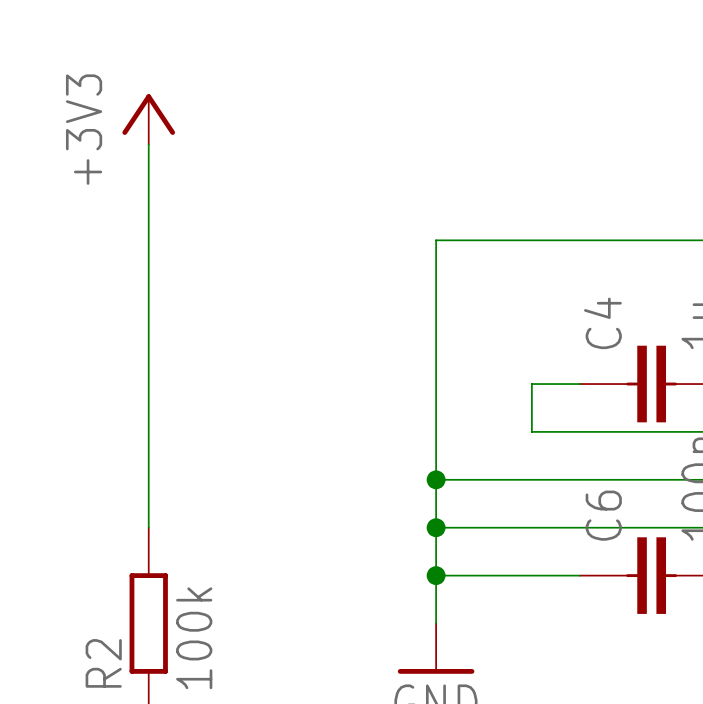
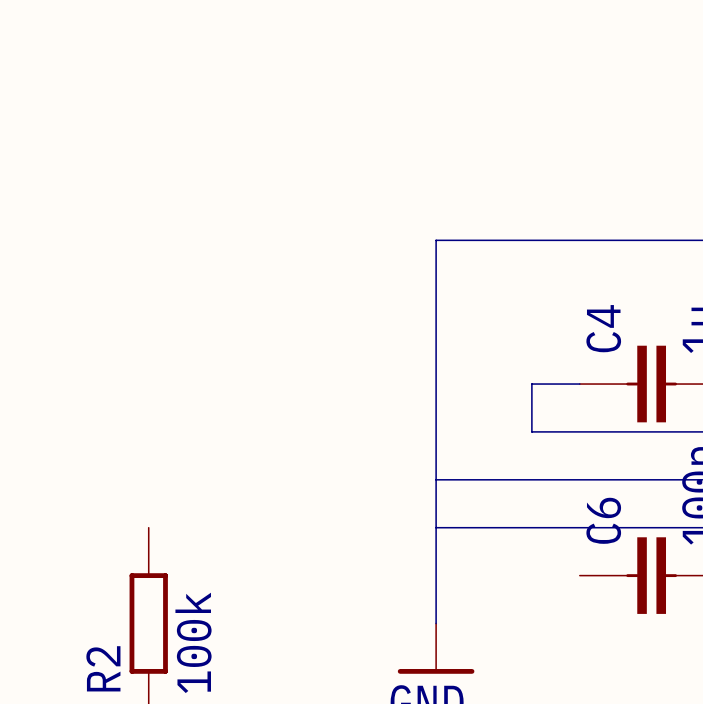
power symbol: +3V3 (148, 119) -> none
wire: (148, 144) (148, 527) -> none
junction: (436, 479) -> none
junction: (436, 527) -> none
wire: (436, 575) (579, 575) -> none
junction: (436, 575) -> none

